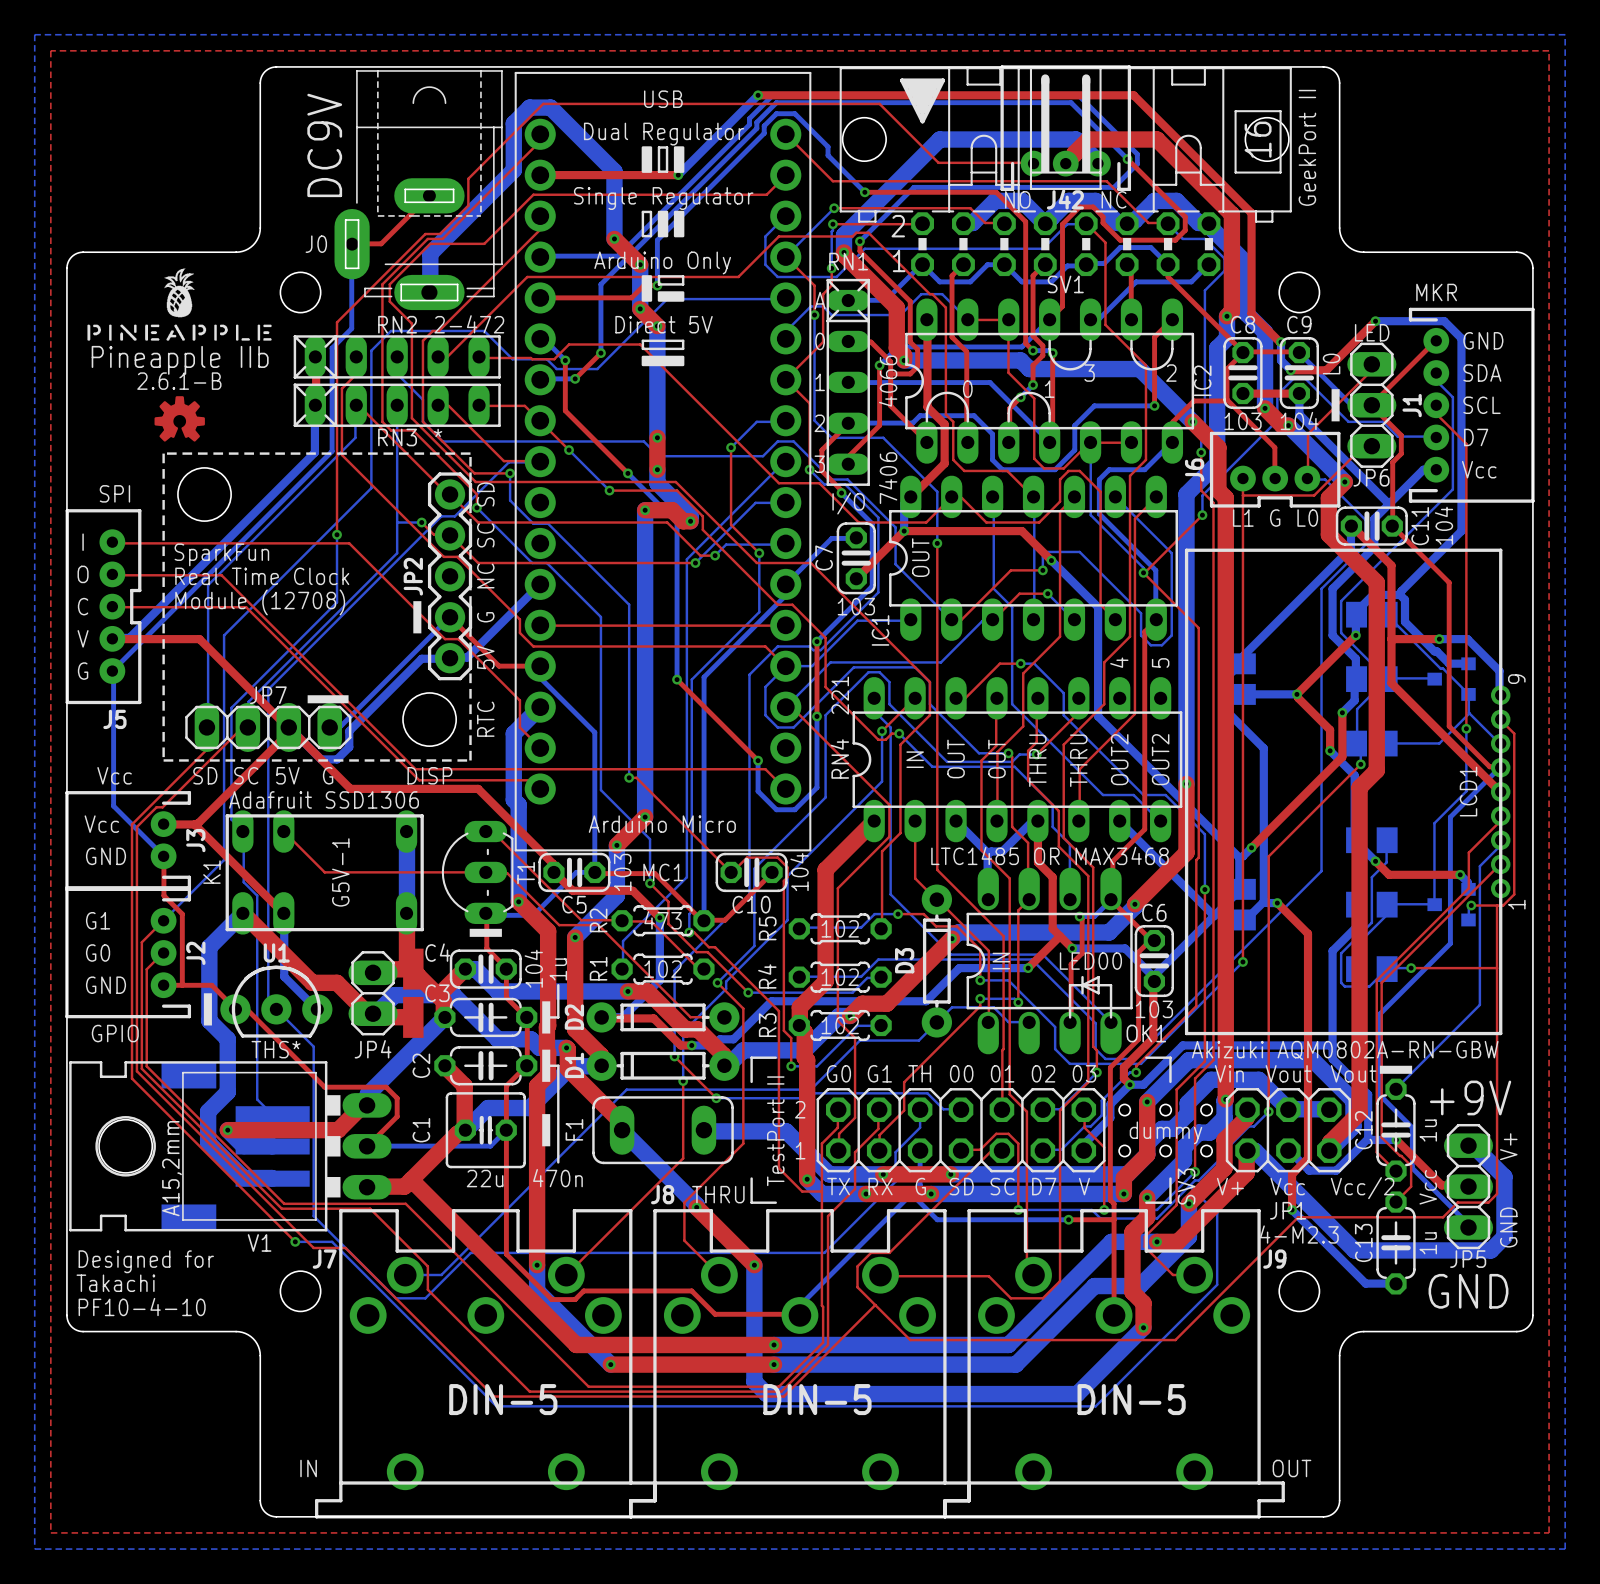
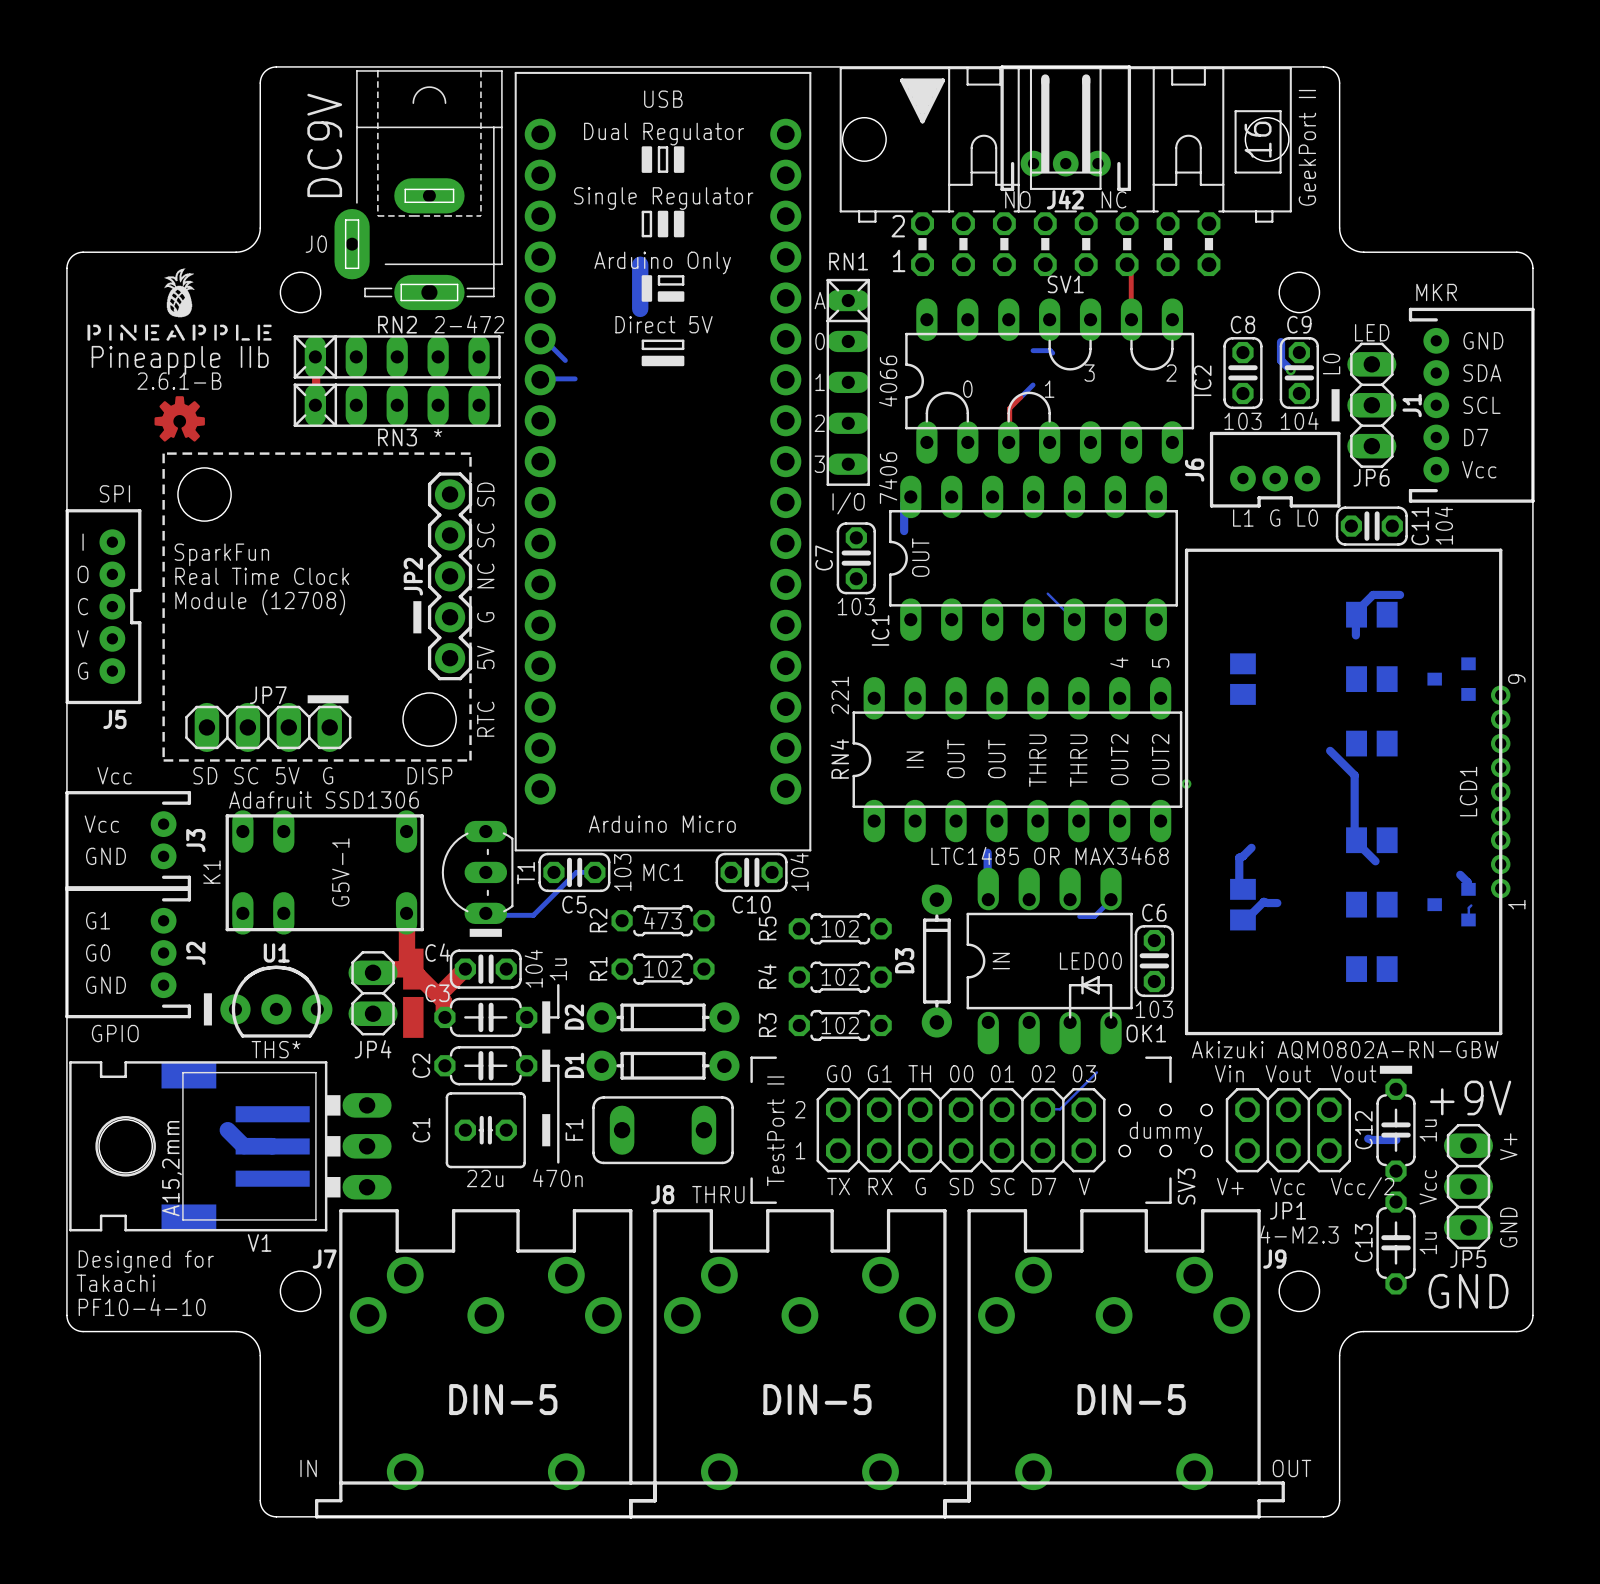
bottom zone outline: (34, 34) (1565, 34) (1565, 1549) (34, 1549) (34, 34) -> none
top zone outline: (50, 50) (1549, 50) (1549, 1532) (50, 1532) (50, 50) -> none
top track: (758, 95) (1133, 95) (1251, 213) (1251, 313) (1281, 342) -> none
bottom track: (758, 95) (678, 175) -> none
via: (758, 95) -> none
top track: (540, 134) (539, 141) (442, 238) (427, 238) (382, 284) (382, 421) (391, 430) (413, 430) (476, 494) (476, 507) -> none
top track: (785, 134) (832, 181) (1106, 181) (1148, 222) (1168, 223) -> none
top track: (1127, 159) (1185, 216) (1185, 230) (1175, 240) (1120, 240) (1103, 222) (1103, 216) (1093, 207) (1079, 207) (1062, 224) (1062, 306) (1049, 319) -> none
bottom track: (1127, 159) (1071, 102) (776, 102) (756, 122) (756, 128) (600, 284) (600, 353) -> none
via: (1127, 159) -> none
top track: (1033, 163) (938, 162) (879, 103) (543, 103) (468, 178) (468, 205) (440, 234) (425, 234) (337, 322) (337, 534) -> none
top track: (1065, 163) (1088, 139) (1157, 139) (1231, 214) (1231, 311) (1227, 316) -> none
bottom track: (1097, 163) (1076, 139) (939, 139) (844, 235) (844, 252) -> none
top track: (678, 175) (540, 175) -> none
via: (678, 175) -> none
top track: (785, 175) (766, 194) (533, 194) (484, 243) (430, 243) (389, 284) (389, 301) (411, 323) (411, 418) (475, 481) (675, 481) (756, 563) (810, 563) (929, 682) (929, 715) (900, 744) (900, 833) (882, 851) (881, 928) -> none
top track: (864, 192) (996, 192) (1025, 221) (1025, 343) (1033, 350) -> none
bottom track: (864, 192) (828, 155) (828, 146) (794, 113) (776, 113) (764, 126) (764, 133) (657, 240) (657, 285) -> none
via: (864, 192) -> none
top track: (429, 195) (381, 243) (352, 244) -> none
top track: (834, 208) (970, 208) (985, 222) (1004, 223) -> none
bottom track: (834, 208) (785, 257) -> none
via: (834, 208) -> none
top track: (540, 216) (539, 230) (438, 331) (432, 331) (422, 340) (422, 421) (474, 473) (510, 473) -> none
bottom track: (785, 216) (765, 236) (765, 264) (777, 276) (836, 276) (864, 248) (1042, 248) (1067, 224) (1086, 223) -> none
top track: (922, 223) (832, 224) -> none
bottom track: (963, 223) (972, 222) (994, 200) (1022, 200) (1045, 223) (1068, 200) (1095, 200) (1117, 222) (1127, 223) (1134, 220) (1154, 200) (1176, 200) (1198, 222) (1208, 222) (1246, 263) (1246, 313) (1265, 332) (1265, 408) -> none
top track: (1086, 223) (1105, 242) (1105, 324) (1145, 365) (1145, 459) (1130, 475) (1130, 636) (1104, 662) (1104, 704) (1063, 744) (1063, 837) (1093, 867) (1093, 1046) (1096, 1050) (1096, 1072) -> none
bottom track: (1168, 223) (1182, 238) (1204, 238) (1224, 258) (1224, 270) (1204, 290) (1204, 426) (1201, 430) (1201, 452) -> none
bottom track: (832, 224) (831, 268) -> none
via: (832, 224) -> none
top track: (614, 238) (640, 264) -> none
bottom track: (614, 238) (614, 171) (550, 107) (529, 107) (513, 123) (513, 170) (430, 253) (429, 292) -> none
via: (614, 238) -> none
top track: (859, 241) (859, 251) (910, 301) (910, 342) (917, 349) (917, 366) (910, 373) (890, 373) -> none
bottom track: (859, 241) (913, 187) (1114, 187) (1137, 164) (1137, 154) (1078, 95) (772, 95) (749, 118) (749, 124) (618, 256) (540, 257) -> none
via: (859, 241) -> none
bottom track: (352, 244) (351, 328) (332, 348) (332, 451) (112, 671) (113, 806) (163, 856) -> none
top track: (844, 252) (844, 254) (896, 307) (896, 348) (904, 355) (904, 360) -> none
via: (844, 252) -> none
top track: (785, 257) (814, 285) (814, 315) -> none
via: (640, 264) -> none
top track: (963, 264) (952, 275) (952, 337) (966, 351) (967, 442) -> none
top track: (1045, 264) (1033, 275) (1033, 335) (1042, 345) (1042, 355) (1033, 365) (1033, 385) -> none
top track: (1168, 264) (1168, 276) (1242, 352) -> none
bottom track: (1168, 264) (1150, 247) (1120, 247) (1104, 263) (1067, 265) (1051, 281) (1022, 281) (1004, 264) (987, 264) (970, 281) (939, 281) (921, 264) (885, 300) (848, 300) -> none
bottom track: (1208, 264) (1191, 281) (1136, 281) (1099, 318) (1090, 319) -> none
top track: (831, 268) (831, 285) (823, 294) (823, 342) (785, 379) (809, 403) (809, 469) -> none
via: (831, 268) -> none
top track: (657, 285) (643, 285) (631, 297) (540, 297) -> none
via: (657, 285) -> none
bottom track: (785, 297) (667, 299) (597, 369) (556, 369) (546, 359) (512, 359) (484, 331) (391, 331) (371, 350) (371, 488) (224, 635) (224, 860) (163, 920) -> none
top track: (640, 308) (657, 326) -> none
via: (640, 308) -> none
bottom track: (814, 315) (814, 420) (831, 437) (883, 437) (937, 491) (937, 543) -> none
via: (814, 315) -> none
bottom track: (1227, 316) (1227, 338) (1217, 348) (1217, 463) (1186, 494) (1186, 783) -> none
via: (1227, 316) -> none
top track: (926, 319) (927, 407) (944, 424) (944, 463) (910, 496) -> none
top track: (967, 319) (1008, 319) (1008, 372) (1034, 398) (1034, 458) (1044, 468) (1063, 468) (1090, 442) -> none
bottom track: (967, 319) (942, 294) (921, 294) (900, 315) (831, 315) (823, 306) (810, 306) (786, 331) (785, 338) -> none
bottom track: (1049, 319) (1022, 346) (898, 346) (879, 365) -> none
top track: (1172, 319) (1154, 337) (1154, 405) -> none
top track: (1375, 321) (1326, 370) (1290, 370) -> none
bottom track: (1375, 321) (1444, 321) (1461, 338) (1461, 531) (1401, 591) (1400, 594) (1404, 599) (1404, 621) (1449, 663) (1468, 663) -> none
via: (1375, 321) -> none
bottom track: (657, 326) (657, 437) -> none
via: (657, 326) -> none
top track: (1436, 340) (1371, 405) (1401, 435) (1401, 453) (1392, 462) (1392, 526) (1449, 582) (1449, 726) (1489, 766) (1500, 767) -> none
top track: (848, 341) (871, 342) (890, 361) (890, 405) (926, 442) -> none
via: (1281, 342) -> none
via: (1033, 350) -> none
top track: (1242, 352) (1299, 352) -> none
top track: (1242, 352) (1227, 369) (1227, 399) -> none
bottom track: (1299, 352) (1350, 404) (1371, 405) -> none
top track: (600, 353) (575, 378) -> none
via: (600, 353) -> none
top track: (1052, 353) (1052, 439) (1049, 442) -> none
via: (1052, 353) -> none
top track: (356, 356) (355, 375) (341, 388) (341, 454) (443, 556) (457, 556) (519, 619) (519, 632) (533, 646) (765, 646) (785, 666) -> none
bottom track: (397, 356) (398, 375) (422, 399) (422, 421) (442, 441) (643, 441) (658, 456) (762, 456) (777, 441) (793, 441) (831, 479) (847, 479) (895, 527) (895, 564) (951, 619) -> none
top track: (438, 356) (447, 356) (527, 276) (738, 276) (778, 236) (852, 236) (856, 232) (868, 232) (945, 307) (945, 414) (953, 421) (953, 459) (964, 470) (1007, 470) (1033, 496) -> none
top track: (479, 356) (554, 359) (569, 344) (640, 344) (778, 483) (819, 483) (858, 522) (926, 522) (951, 496) (961, 497) (986, 522) (1039, 522) (1060, 501) (1060, 479) (1068, 470) (1079, 470) (1100, 491) (1100, 604) (1115, 619) -> none
top track: (565, 360) (565, 410) (627, 473) -> none
via: (565, 360) -> none
bottom track: (904, 360) (1020, 360) (1029, 369) (1139, 369) (1192, 421) -> none
via: (904, 360) -> none
top track: (1371, 364) (1370, 371) (1308, 434) (1307, 478) -> none
top track: (879, 365) (879, 425) (848, 456) (848, 464) -> none
via: (879, 365) -> none
bottom track: (1436, 373) (1436, 381) (1452, 397) (1452, 489) (1341, 601) (1341, 632) (1387, 679) -> none
via: (575, 378) -> none
bottom track: (848, 382) (990, 382) (1049, 442) -> none
via: (1033, 385) -> none
top track: (1242, 393) (1299, 393) -> none
bottom track: (1299, 393) (1299, 414) (1389, 504) -> none
via: (1020, 397) -> none
top track: (1227, 399) (1274, 447) (1275, 478) -> none
top track: (1227, 399) (1193, 400) (1172, 421) (1172, 442) -> none
bottom track: (315, 405) (314, 452) (129, 637) (112, 638) -> none
top track: (356, 405) (359, 405) (447, 494) (449, 494) -> none
bottom track: (356, 405) (355, 437) (208, 585) (206, 727) -> none
bottom track: (397, 405) (397, 553) (248, 701) (247, 727) -> none
top track: (438, 405) (448, 405) (503, 461) (540, 461) -> none
top track: (479, 405) (524, 405) (569, 450) -> none
bottom track: (1154, 405) (1094, 405) (1074, 425) (1074, 450) (1055, 469) (1002, 469) (992, 459) (992, 434) (974, 415) (920, 415) (912, 423) (848, 423) -> none
via: (1154, 405) -> none
top track: (1436, 405) (1436, 414) (1466, 443) (1466, 728) -> none
top track: (1265, 408) (1282, 425) (1288, 425) -> none
via: (1265, 408) -> none
bottom track: (785, 420) (756, 421) (731, 447) -> none
top track: (1192, 421) (1218, 447) (1218, 490) (1225, 497) (1225, 1099) -> none
via: (1192, 421) -> none
top track: (848, 423) (821, 450) (821, 470) (841, 490) (841, 493) -> none
bottom track: (1288, 425) (1344, 481) -> none
via: (1288, 425) -> none
top track: (657, 437) (657, 469) -> none
via: (657, 437) -> none
bottom track: (1436, 437) (1397, 436) (1382, 421) (1348, 421) (1305, 378) (1293, 378) (1277, 394) (1277, 420) (1202, 495) (1202, 515) -> none
bottom track: (1090, 442) (1090, 515) (1143, 567) (1143, 572) -> none
top track: (1131, 442) (1090, 442) -> none
bottom track: (1172, 442) (1144, 469) (1109, 469) (1099, 479) (1099, 513) (1155, 570) (1156, 619) -> none
top track: (1371, 446) (1363, 446) (1314, 495) (1242, 495) -> none
top track: (731, 447) (731, 524) (759, 553) -> none
via: (731, 447) -> none
bottom track: (569, 450) (609, 490) -> none
via: (569, 450) -> none
top track: (1201, 452) (1201, 490) (1213, 502) (1213, 1060) (1195, 1078) (1195, 1171) -> none
via: (1201, 452) -> none
bottom track: (540, 461) (508, 462) (454, 516) (441, 516) (268, 689) (268, 1001) (313, 1046) (313, 1216) (395, 1298) (425, 1298) (470, 1252) (824, 1252) (895, 1181) (895, 1152) (920, 1127) (920, 1109) -> none
bottom track: (785, 461) (686, 559) (686, 877) (623, 941) (622, 969) -> none
bottom track: (657, 469) (657, 483) (690, 516) (690, 521) -> none
via: (657, 469) -> none
bottom track: (809, 469) (824, 484) (845, 484) (878, 517) (878, 592) (820, 650) (813, 650) (809, 646) (777, 646) (749, 674) (749, 895) (674, 970) (674, 1056) -> none
via: (809, 469) -> none
bottom track: (1436, 469) (1423, 469) (1374, 518) (1374, 547) (1332, 588) (1332, 635) (1355, 658) (1354, 700) (1342, 712) -> none
bottom track: (510, 473) (510, 500) (533, 523) (548, 523) (629, 604) (629, 777) -> none
via: (510, 473) -> none
bottom track: (627, 473) (677, 522) (677, 679) -> none
via: (627, 473) -> none
top track: (1242, 478) (1242, 961) -> none
bottom track: (1307, 478) (1325, 479) (1365, 520) (1365, 544) (1321, 588) (1321, 871) (1133, 1058) (1105, 1058) (1095, 1049) (1095, 1023) (1031, 959) (878, 959) (861, 976) (799, 977) -> none
top track: (1344, 481) (1328, 497) (1328, 534) (1376, 582) (1376, 770) (1359, 787) (1359, 1112) (1330, 1142) (1329, 1150) -> none
via: (1344, 481) -> none
top track: (609, 490) (677, 490) (702, 516) (702, 529) (777, 604) (792, 604) (825, 637) (825, 687) (878, 739) (885, 739) (891, 733) (899, 733) -> none
via: (609, 490) -> none
bottom track: (841, 493) (872, 523) (872, 586) (816, 641) -> none
via: (841, 493) -> none
top track: (450, 494) (478, 522) (667, 522) (700, 555) (715, 555) -> none
bottom track: (992, 496) (993, 588) (1012, 607) (1012, 704) (1103, 795) (1133, 795) (1160, 821) -> none
bottom track: (1033, 496) (1033, 619) -> none
top track: (1074, 496) (1060, 511) (1060, 636) (1023, 673) (1023, 726) (997, 752) (996, 821) -> none
bottom track: (1115, 496) (1171, 553) (1171, 635) (1161, 645) (1150, 645) (1141, 635) (1141, 613) (1079, 551) (1047, 551) (1042, 556) (1042, 570) -> none
top track: (1156, 496) (1134, 518) (1134, 714) (1079, 769) (1078, 821) -> none
bottom track: (785, 502) (755, 502) (695, 563) -> none
bottom track: (476, 507) (532, 563) (546, 563) (600, 617) (600, 790) (650, 839) (650, 883) -> none
via: (476, 507) -> none
top track: (645, 510) (672, 510) (683, 521) (690, 521) -> none
bottom track: (645, 510) (645, 817) -> none
via: (645, 510) -> none
top track: (1202, 515) (1143, 572) (1198, 628) (1196, 1006) (1136, 1066) (1136, 1072) -> none
via: (1202, 515) -> none
via: (690, 521) -> none
bottom track: (397, 522) (421, 522) -> none
top track: (421, 522) (433, 534) (449, 534) (478, 563) (695, 563) -> none
via: (421, 522) -> none
top track: (1351, 526) (1391, 565) (1391, 683) (1500, 791) -> none
bottom track: (1351, 526) (1350, 548) (1244, 655) (1242, 664) (1239, 664) (1223, 680) (1223, 707) (1263, 748) (1263, 901) -> none
via: (904, 531) -> none
bottom track: (337, 534) (337, 602) (231, 707) (231, 819) (243, 831) (243, 882) (257, 895) (257, 1099) (272, 1114) -> none
via: (337, 534) -> none
bottom track: (856, 537) (831, 538) (785, 584) (785, 596) (704, 677) (703, 920) -> none
top track: (112, 542) (349, 543) (445, 639) (458, 639) (519, 700) (519, 727) (540, 748) -> none
bottom track: (785, 543) (726, 544) (715, 555) -> none
top track: (937, 543) (937, 869) (1003, 936) (1001, 1109) -> none
via: (937, 543) -> none
bottom track: (759, 553) (759, 612) (691, 679) (691, 911) (689, 914) (689, 932) -> none
via: (759, 553) -> none
via: (715, 555) -> none
top track: (1051, 560) (1022, 531) (904, 531) (856, 578) -> none
bottom track: (1051, 560) (1098, 607) (1098, 716) (1239, 857) -> none
via: (1051, 560) -> none
via: (695, 563) -> none
top track: (1042, 570) (1010, 570) (961, 619) (951, 619) -> none
via: (1042, 570) -> none
via: (1143, 572) -> none
top track: (112, 574) (221, 575) (415, 769) (765, 769) (785, 788) -> none
bottom track: (540, 584) (467, 657) (421, 658) (349, 731) (349, 747) (337, 759) (321, 759) (288, 727) -> none
top track: (1047, 593) (1019, 593) (992, 619) -> none
via: (1047, 593) -> none
top track: (112, 606) (246, 607) (419, 780) (530, 780) (540, 788) -> none
bottom track: (1387, 614) (1468, 694) (1468, 712) (1500, 743) -> none
bottom track: (449, 617) (340, 726) (329, 727) -> none
top track: (450, 617) (499, 666) (540, 666) -> none
bottom track: (910, 619) (857, 620) (812, 666) (785, 666) (765, 687) (765, 715) (777, 727) (793, 727) (853, 667) (915, 667) (929, 682) (929, 704) (979, 753) (1008, 753) -> none
bottom track: (992, 619) (982, 620) (940, 662) (830, 662) (785, 707) -> none
top track: (1156, 619) (1144, 631) (1144, 829) (1112, 861) (1112, 898) (1111, 899) (1150, 939) (1154, 940) (1149, 941) (1138, 952) (1138, 1039) (1110, 1067) (1110, 1200) (1114, 1203) (1114, 1315) -> none
top track: (540, 625) (785, 625) -> none
top track: (1355, 635) (1296, 694) (1298, 698) (1330, 729) (1330, 750) -> none
via: (1355, 635) -> none
top track: (112, 638) (199, 639) (288, 727) -> none
top track: (1391, 639) (1439, 639) -> none
bottom track: (1439, 639) (1467, 639) (1499, 671) (1500, 695) -> none
via: (1439, 639) -> none
top track: (816, 641) (816, 716) -> none
via: (816, 641) -> none
top track: (1020, 663) (999, 663) (965, 698) (956, 698) -> none
bottom track: (1020, 663) (1034, 663) (1063, 693) (1063, 715) (1143, 795) (1165, 795) (1204, 834) (1204, 889) -> none
via: (1020, 663) -> none
bottom track: (540, 666) (540, 678) (594, 732) (594, 872) -> none
top track: (677, 679) (758, 760) -> none
via: (677, 679) -> none
bottom track: (1387, 679) (1434, 679) -> none
bottom track: (1387, 679) (1357, 709) (1356, 743) (1360, 748) (1360, 764) -> none
bottom track: (1242, 694) (1296, 694) -> none
via: (1296, 694) -> none
bottom track: (874, 698) (874, 711) (890, 727) (890, 894) (950, 954) (1042, 954) (1111, 1022) -> none
top track: (915, 698) (882, 731) -> none
top track: (996, 698) (996, 745) (981, 760) (981, 850) (1009, 878) (1009, 1094) (1026, 1111) (1026, 1268) (1033, 1275) -> none
top track: (1037, 698) (1036, 742) (1028, 750) (1028, 780) (1058, 810) (1058, 846) (1088, 876) (1088, 1082) (1060, 1110) (1060, 1281) (1042, 1298) (1010, 1298) (988, 1276) (880, 1275) -> none
top track: (1078, 698) (1078, 712) (1036, 754) -> none
bottom track: (540, 707) (513, 733) (513, 799) (518, 804) (518, 901) -> none
top track: (785, 707) (792, 707) (889, 804) (889, 836) (837, 888) (837, 1020) (855, 1038) (855, 1117) (839, 1133) (838, 1150) -> none
top track: (1342, 712) (1342, 756) (1251, 847) -> none
via: (1342, 712) -> none
bottom track: (1469, 713) (1439, 743) (1387, 743) -> none
bottom track: (816, 716) (816, 787) (794, 809) (776, 809) (758, 791) (758, 760) -> none
via: (816, 716) -> none
top track: (1500, 719) (1514, 733) (1514, 894) (1503, 905) (1471, 905) -> none
top track: (206, 727) (206, 749) (132, 824) (132, 1078) (295, 1241) -> none
top track: (247, 727) (242, 727) (162, 807) (156, 807) (136, 826) (136, 1071) (313, 1247) (345, 1247) (494, 1396) (783, 1396) (875, 1305) -> none
top track: (288, 727) (350, 788) (478, 788) (553, 863) (553, 872) (572, 890) (632, 890) (659, 917) -> none
top track: (288, 727) (289, 732) (198, 823) (194, 824) -> none
bottom track: (1466, 728) (1466, 791) (1434, 823) (1434, 904) (1387, 904) (1386, 915) (1357, 944) (1356, 969) -> none
via: (1466, 728) -> none
bottom track: (882, 731) (882, 781) (787, 876) (787, 920) (726, 981) (726, 988) (683, 1031) (683, 1081) -> none
via: (882, 731) -> none
bottom track: (899, 733) (932, 766) (1014, 766) (1052, 804) (1052, 826) (1069, 844) (1070, 899) -> none
via: (899, 733) -> none
via: (1330, 750) -> none
top track: (1008, 753) (1012, 756) (1012, 826) (1028, 842) (1029, 899) (1018, 910) (1018, 1002) -> none
via: (1008, 753) -> none
bottom track: (1036, 754) (1019, 754) (1012, 761) (947, 761) (889, 704) (889, 682) (879, 672) (868, 672) (825, 715) (825, 797) (754, 868) (754, 946) (717, 982) -> none
via: (1036, 754) -> none
via: (758, 760) -> none
top track: (1360, 764) (1268, 856) (1268, 1111) -> none
via: (1360, 764) -> none
bottom track: (1500, 767) (1450, 817) (1450, 943) (1380, 1013) (1380, 1095) (1412, 1127) (1412, 1168) (1467, 1223) (1468, 1227) -> none
top track: (629, 777) (636, 777) (731, 872) -> none
via: (629, 777) -> none
top track: (1186, 783) (1186, 852) (1134, 904) -> none
top track: (1500, 816) (1499, 822) (1468, 852) (1468, 888) (1376, 980) (1376, 1152) (1396, 1171) -> none
top track: (645, 817) (616, 845) -> none
via: (645, 817) -> none
top track: (874, 821) (825, 869) (825, 981) (799, 1007) (799, 1025) (804, 1031) (804, 1057) (807, 1060) (807, 1179) -> none
top track: (915, 821) (915, 878) (988, 950) (988, 1022) -> none
bottom track: (956, 821) (987, 852) (1002, 851) (1031, 822) (1037, 821) -> none
top track: (1037, 821) (1037, 862) (1052, 877) (1052, 928) (1072, 948) -> none
bottom track: (1119, 821) (1214, 915) -> none
top track: (163, 824) (194, 824) -> none
top track: (194, 824) (283, 913) -> none
top track: (283, 831) (324, 872) (485, 872) -> none
bottom track: (406, 831) (406, 913) -> none
top track: (485, 831) (492, 831) (581, 920) (651, 921) (697, 968) (703, 969) -> none
bottom track: (1387, 840) (1386, 862) (1371, 877) (1371, 922) (1341, 953) (1341, 982) (1344, 986) (1369, 986) (1387, 968) (1411, 968) -> none
bottom track: (1500, 840) (1499, 846) (1479, 866) (1479, 1004) (1396, 1089) -> none
bottom track: (616, 845) (616, 895) (575, 937) -> none
via: (616, 845) -> none
via: (1251, 847) -> none
top track: (163, 856) (163, 895) (182, 914) (182, 985) -> none
top track: (1375, 861) (1389, 874) (1460, 874) -> none
via: (1375, 861) -> none
top track: (1500, 864) (1381, 982) (1381, 1137) (1411, 1165) (1411, 1186) (1396, 1202) -> none
top track: (485, 872) (507, 873) (559, 925) (598, 925) (690, 1017) (724, 1017) -> none
top track: (594, 872) (654, 873) (703, 920) (724, 920) (772, 872) -> none
top track: (731, 872) (747, 857) (777, 857) (787, 867) (787, 877) (783, 880) (783, 1030) (791, 1038) (791, 1066) -> none
via: (1460, 874) -> none
top track: (650, 883) (668, 901) (668, 923) (696, 952) (707, 952) (748, 992) -> none
via: (650, 883) -> none
top track: (1204, 889) (1204, 1061) (1176, 1089) (1176, 1205) (1144, 1236) (1144, 1246) (1172, 1275) (1194, 1275) -> none
via: (1204, 889) -> none
bottom track: (1242, 889) (1240, 889) (1154, 975) (1154, 981) (1150, 974) (1125, 948) (1072, 948) -> none
top track: (518, 901) (548, 931) (548, 1074) (537, 1085) (537, 1265) -> none
via: (518, 901) -> none
top track: (1277, 903) (1308, 933) (1308, 1158) (1292, 1174) (1292, 1209) -> none
via: (1277, 903) -> none
bottom track: (1134, 904) (1134, 906) (1109, 932) (958, 932) (952, 938) -> none
via: (1134, 904) -> none
bottom track: (1356, 904) (1355, 927) (1332, 950) (1332, 1058) (1368, 1094) (1368, 1138) (1336, 1170) (1309, 1170) (1288, 1150) -> none
via: (1471, 905) -> none
top track: (1497, 905) (1497, 1193) (1488, 1202) (1457, 1202) (1443, 1217) (1298, 1217) (1175, 1340) (910, 1340) (857, 1287) (857, 1266) (871, 1252) (889, 1252) (991, 1151) (1001, 1150) -> none
top track: (242, 913) (312, 982) (337, 982) (365, 1011) (376, 1017) (413, 1017) -> none
bottom track: (242, 913) (209, 947) (209, 1020) (227, 1039) (227, 1092) (208, 1111) (208, 1142) (243, 1178) (272, 1178) -> none
bottom track: (283, 913) (284, 976) (317, 1009) -> none
top track: (485, 913) (486, 948) (506, 969) -> none
top track: (898, 914) (923, 914) (936, 926) (956, 926) (980, 949) (980, 980) -> none
bottom track: (898, 914) (874, 914) (861, 927) (799, 928) -> none
via: (898, 914) -> none
top track: (1079, 916) (1082, 919) (1082, 953) (1071, 964) (1070, 1022) -> none
via: (1079, 916) -> none
bottom track: (659, 917) (659, 980) (623, 1017) (601, 1017) -> none
via: (659, 917) -> none
top track: (163, 920) (141, 942) (141, 1068) (281, 1208) (370, 1208) (427, 1266) (427, 1289) (529, 1391) (781, 1391) (828, 1344) (828, 1216) (855, 1189) (855, 1152) (878, 1128) (879, 1109) -> none
top track: (689, 932) (694, 932) (708, 947) (715, 947) (778, 1011) (778, 1168) (802, 1191) (821, 1191) -> none
via: (689, 932) -> none
top track: (1060, 936) (1028, 968) -> none
top track: (575, 937) (575, 1029) (600, 1055) (601, 1065) -> none
via: (575, 937) -> none
top track: (952, 938) (886, 1003) (862, 1003) (850, 1015) -> none
via: (952, 938) -> none
via: (1072, 948) -> none
top track: (163, 952) (146, 969) (146, 1066) (284, 1203) (405, 1203) (588, 1386) (778, 1386) (823, 1342) (821, 1143) (837, 1127) (838, 1109) -> none
bottom track: (1242, 961) (1141, 1063) (1069, 1063) (1055, 1049) (1055, 1027) (1008, 980) (980, 980) -> none
via: (1242, 961) -> none
bottom track: (1028, 968) (959, 968) (926, 1001) (771, 1001) (733, 1039) (720, 1039) (713, 1045) (691, 1045) -> none
via: (1028, 968) -> none
top track: (1411, 968) (1497, 968) -> none
via: (1411, 968) -> none
bottom track: (465, 969) (475, 969) (497, 991) (627, 991) -> none
top track: (506, 969) (506, 997) (527, 1018) (527, 1063) (506, 1085) (506, 1130) -> none
bottom track: (881, 977) (867, 977) (852, 992) (748, 992) -> none
via: (980, 980) -> none
top track: (1154, 981) (1153, 1038) (1123, 1067) (1123, 1078) (1130, 1084) -> none
top track: (717, 982) (743, 1008) (743, 1143) (684, 1202) (684, 1240) (719, 1275) -> none
via: (717, 982) -> none
top track: (163, 985) (211, 985) (235, 1009) (247, 1009) (324, 1087) (386, 1087) (397, 1098) (397, 1116) (367, 1146) -> none
top track: (627, 991) (647, 991) (685, 1029) (697, 1029) (723, 1055) (724, 1065) -> none
via: (627, 991) -> none
via: (748, 992) -> none
top track: (980, 998) (980, 1006) (904, 1082) (904, 1110) (879, 1135) (879, 1150) -> none
bottom track: (980, 998) (1014, 998) (1018, 1002) -> none
via: (980, 998) -> none
via: (1018, 1002) -> none
bottom track: (373, 1013) (376, 1013) (394, 995) (453, 995) (497, 1039) (530, 1039) (539, 1047) (566, 1047) -> none
bottom track: (850, 1015) (839, 1015) (804, 1050) (743, 1050) (728, 1065) (724, 1065) -> none
via: (850, 1015) -> none
bottom track: (444, 1017) (367, 1094) (367, 1105) -> none
top track: (601, 1017) (653, 1018) (680, 1045) (691, 1045) -> none
bottom track: (1029, 1022) (1008, 1022) (993, 1007) (952, 1007) (918, 1040) (859, 1040) (810, 1089) (626, 1089) (441, 1275) (405, 1275) -> none
bottom track: (881, 1025) (857, 1025) (816, 1066) (791, 1066) -> none
via: (691, 1045) -> none
bottom track: (1332, 1045) (1182, 1045) (1143, 1084) (1130, 1084) (1110, 1104) (1110, 1117) (1084, 1143) (1083, 1150) -> none
top track: (566, 1047) (567, 1068) (621, 1122) (621, 1130) -> none
via: (566, 1047) -> none
top track: (674, 1056) (716, 1098) -> none
via: (674, 1056) -> none
top track: (444, 1065) (464, 1085) (465, 1130) (457, 1133) (404, 1186) (367, 1187) -> none
bottom track: (601, 1065) (571, 1066) (529, 1108) (488, 1108) (465, 1130) -> none
via: (791, 1066) -> none
via: (1096, 1072) -> none
bottom track: (1136, 1072) (1130, 1072) (1101, 1100) (1101, 1115) (1090, 1126) (1084, 1126) (1061, 1149) (1042, 1150) -> none
via: (1136, 1072) -> none
top track: (683, 1081) (683, 1158) (566, 1275) -> none
via: (683, 1081) -> none
via: (1130, 1084) -> none
bottom track: (716, 1098) (809, 1098) (814, 1093) (927, 1093) (943, 1109) (961, 1109) -> none
via: (716, 1098) -> none
bottom track: (1225, 1099) (1224, 1117) (1209, 1132) (1198, 1132) (1184, 1147) (1184, 1160) (1147, 1197) -> none
via: (1225, 1099) -> none
top track: (1147, 1101) (1147, 1154) (1123, 1178) (1123, 1193) -> none
bottom track: (1147, 1101) (1188, 1060) (1312, 1060) (1353, 1100) (1353, 1126) (1329, 1150) -> none
via: (1147, 1101) -> none
top track: (367, 1105) (362, 1105) (338, 1130) (227, 1130) -> none
top track: (1083, 1109) (1084, 1127) (1104, 1147) (1104, 1209) -> none
top track: (1247, 1109) (1246, 1117) (1224, 1139) (1224, 1168) (1188, 1203) -> none
bottom track: (1329, 1109) (1288, 1109) (1258, 1079) (1211, 1079) (1187, 1103) (1187, 1114) (1172, 1128) (1161, 1128) (1147, 1143) (1147, 1154) (1127, 1174) (950, 1174) -> none
bottom track: (1268, 1111) (1254, 1126) (1249, 1126) (1230, 1144) (1230, 1148) (1198, 1180) (1195, 1180) (1157, 1218) (1100, 1218) (1091, 1209) (1018, 1209) -> none
via: (1268, 1111) -> none
via: (227, 1130) -> none
top track: (506, 1130) (506, 1254) (551, 1299) (575, 1299) (583, 1290) (691, 1290) (715, 1314) (799, 1315) -> none
bottom track: (506, 1130) (490, 1146) (367, 1146) -> none
bottom track: (622, 1130) (696, 1205) (696, 1207) -> none
bottom track: (703, 1130) (786, 1131) (829, 1174) (883, 1174) -> none
top track: (1396, 1139) (1441, 1185) (1468, 1186) -> none
via: (1396, 1139) -> none
bottom track: (1468, 1145) (1473, 1146) (1504, 1176) (1504, 1236) (1490, 1250) (1354, 1250) (1255, 1151) (1247, 1150) -> none
bottom track: (920, 1150) (920, 1185) (801, 1304) (799, 1315) -> none
top track: (961, 1150) (980, 1149) (996, 1133) (1008, 1133) (1018, 1143) (1018, 1209) -> none
top track: (1247, 1150) (1246, 1173) (1177, 1241) (1157, 1241) -> none
bottom track: (1195, 1171) (1157, 1209) (1104, 1209) -> none
via: (1195, 1171) -> none
top track: (883, 1174) (950, 1174) -> none
via: (883, 1174) -> none
via: (950, 1174) -> none
top track: (411, 1179) (576, 1344) (774, 1344) -> none
bottom track: (807, 1179) (821, 1193) (866, 1193) -> none
via: (807, 1179) -> none
bottom track: (1189, 1186) (1217, 1213) (1217, 1284) (1095, 1406) (496, 1406) (332, 1241) (295, 1241) -> none
top track: (866, 1193) (931, 1193) -> none
via: (866, 1193) -> none
bottom track: (911, 1193) (937, 1219) (1068, 1219) -> none
bottom track: (931, 1193) (1123, 1193) -> none
via: (931, 1193) -> none
via: (1123, 1193) -> none
top track: (1147, 1197) (1147, 1217) (1132, 1232) (1132, 1292) (1143, 1303) (1143, 1327) -> none
via: (1147, 1197) -> none
bottom track: (1188, 1203) (1188, 1236) (1139, 1286) (1094, 1286) (1015, 1364) (774, 1364) -> none
via: (1188, 1203) -> none
top track: (696, 1207) (754, 1265) -> none
via: (696, 1207) -> none
via: (1018, 1209) -> none
via: (1104, 1209) -> none
bottom track: (1292, 1209) (1365, 1283) (1396, 1283) -> none
via: (1292, 1209) -> none
top track: (1068, 1219) (1114, 1219) -> none
via: (1068, 1219) -> none
via: (295, 1241) -> none
bottom track: (1157, 1241) (1111, 1241) (1008, 1344) (774, 1344) -> none
via: (1157, 1241) -> none
bottom track: (537, 1265) (537, 1290) (610, 1364) -> none
via: (537, 1265) -> none
bottom track: (754, 1265) (754, 1381) (766, 1394) (1077, 1394) (1143, 1327) -> none
via: (754, 1265) -> none
via: (1143, 1327) -> none
via: (774, 1344) -> none
top track: (610, 1364) (774, 1364) -> none
via: (610, 1364) -> none
via: (774, 1364) -> none

